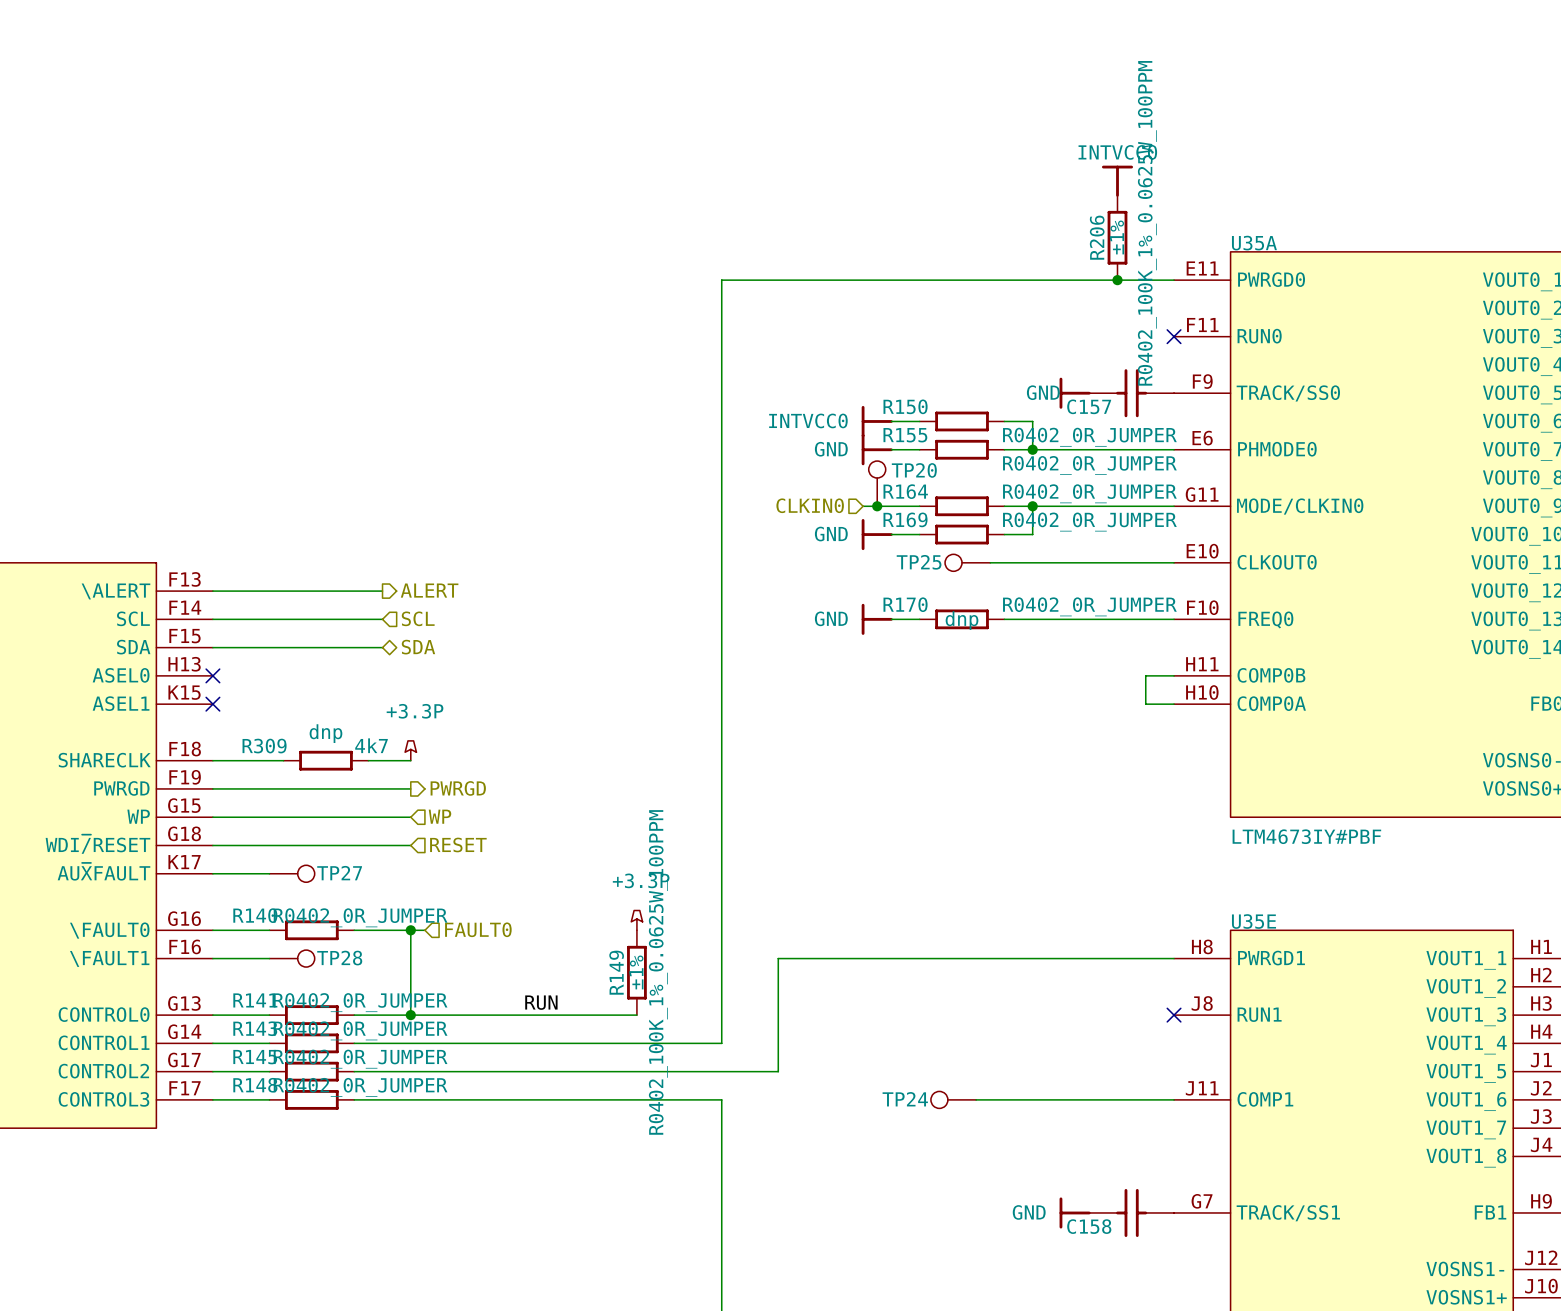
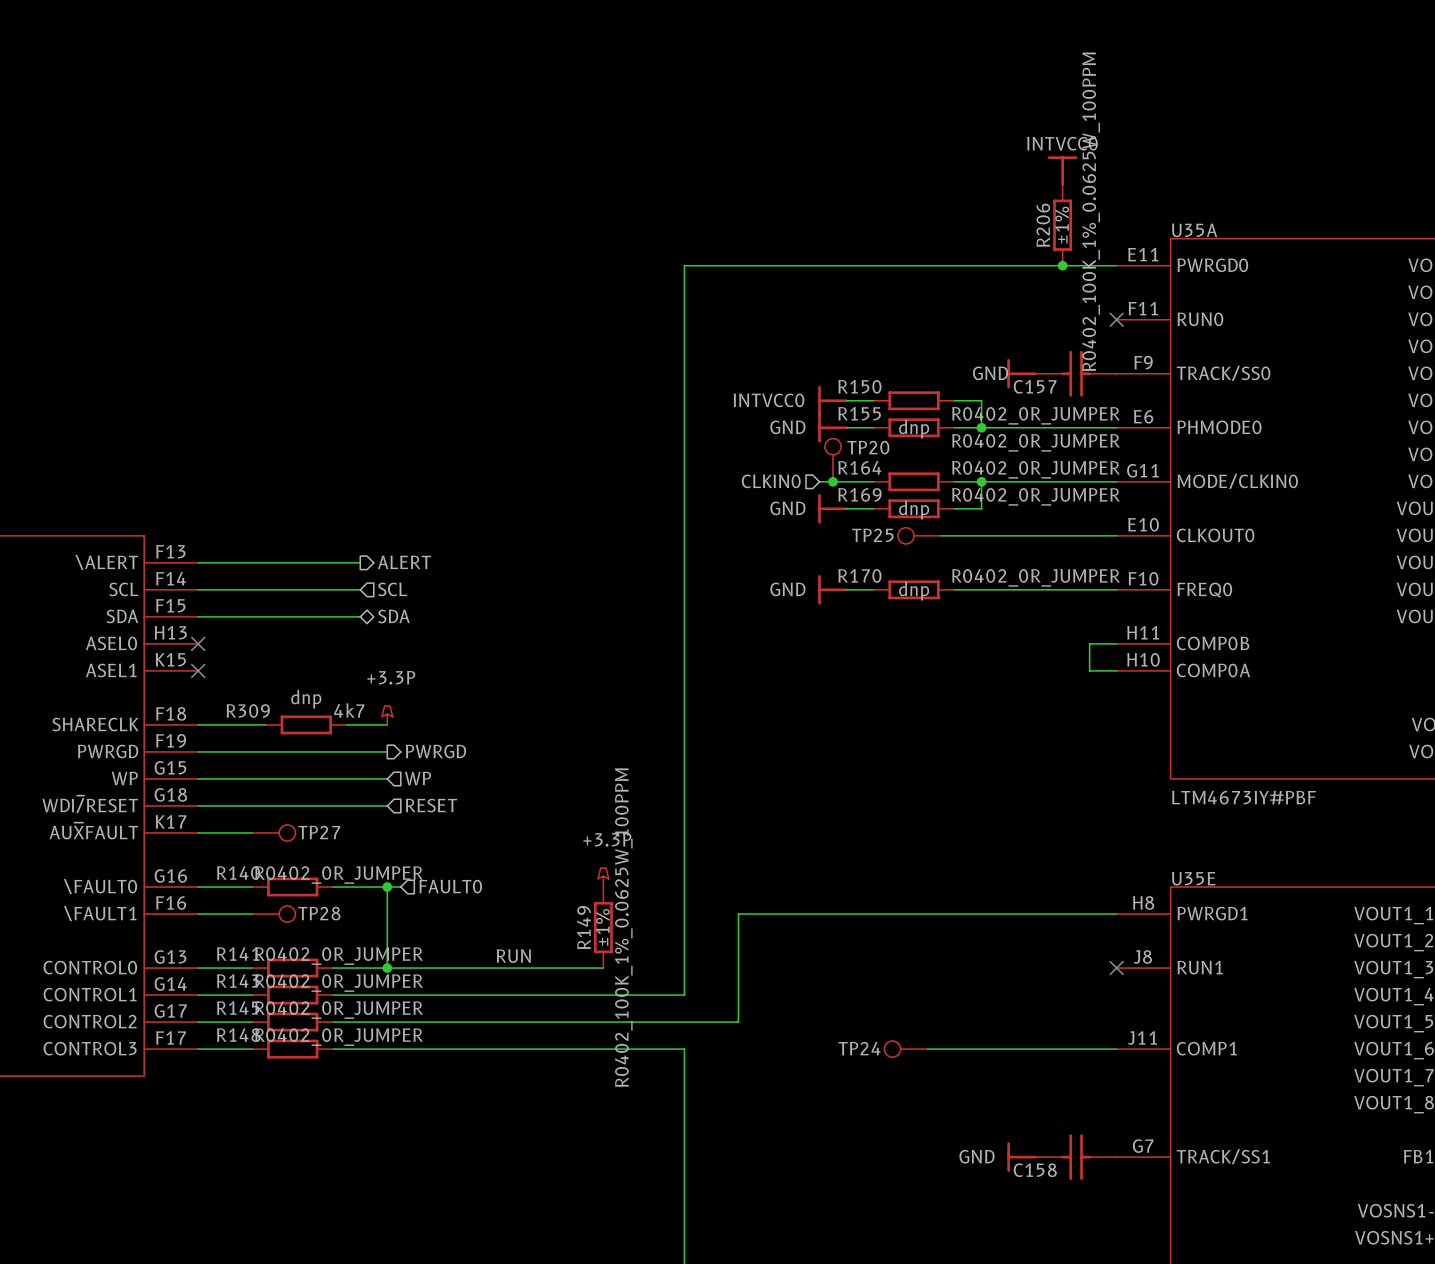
R155 text: none -> dnp (914, 429)
R169 text: none -> dnp (914, 510)

